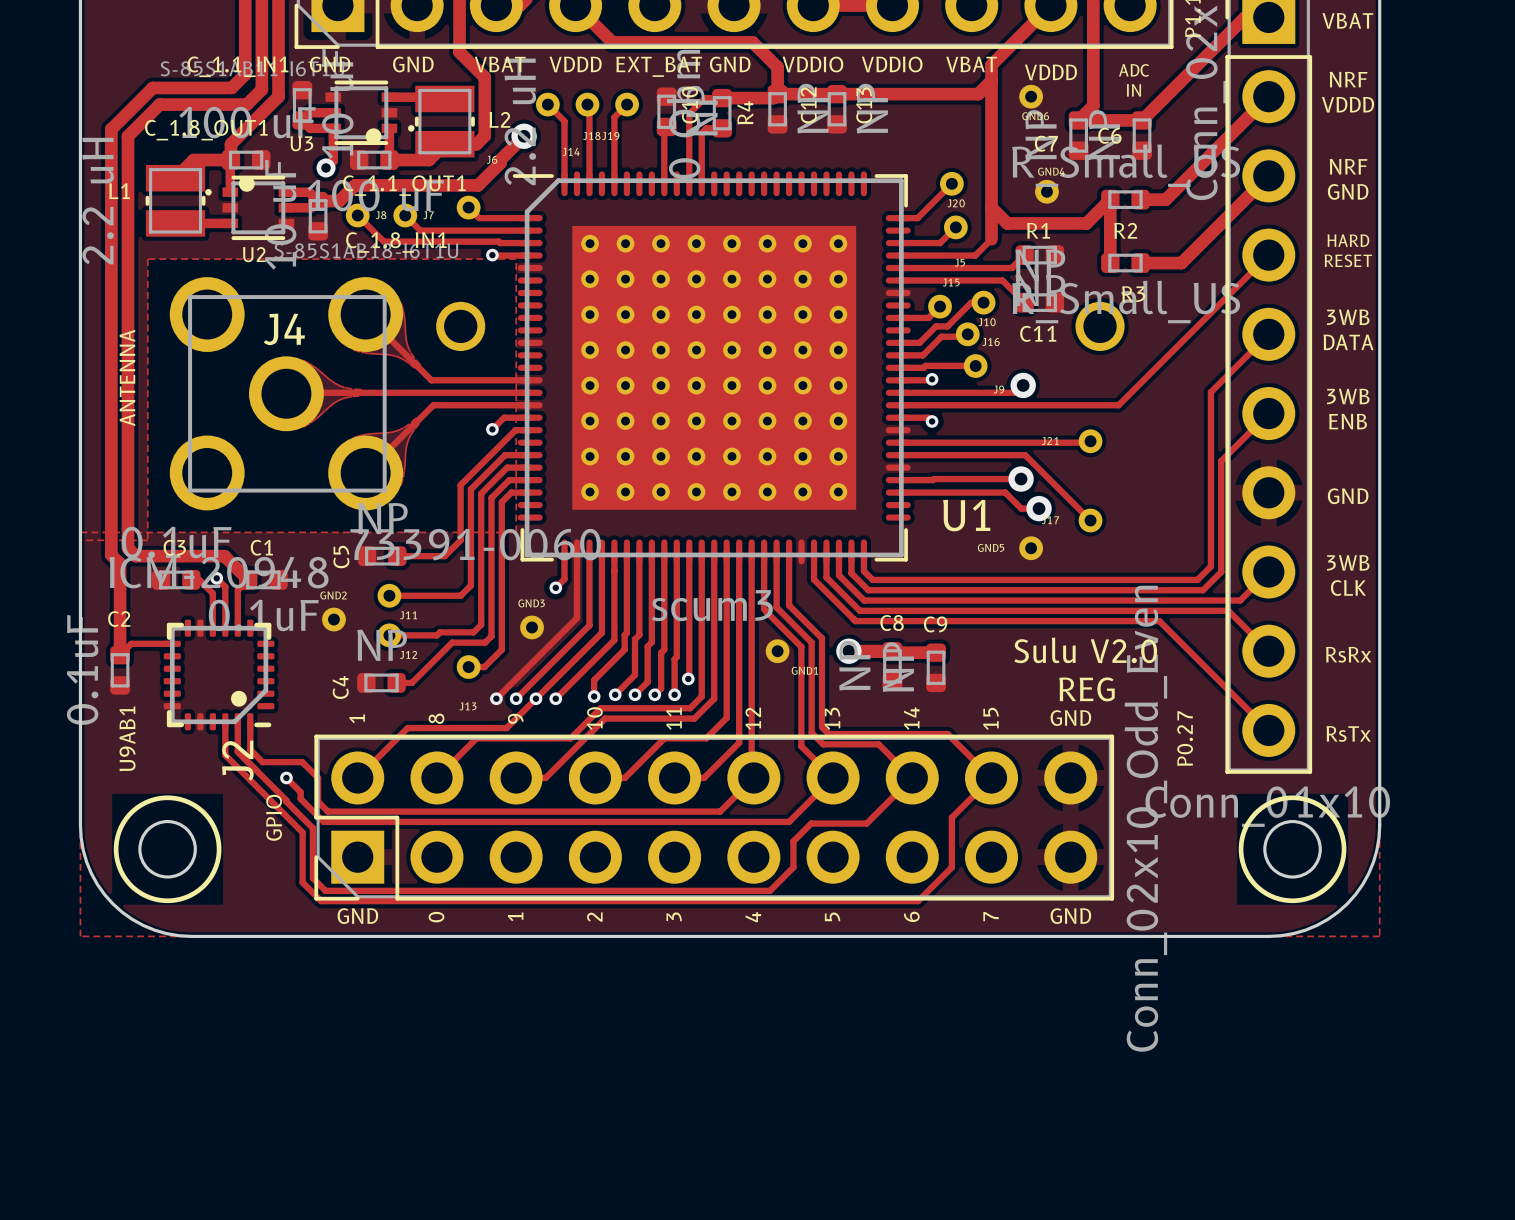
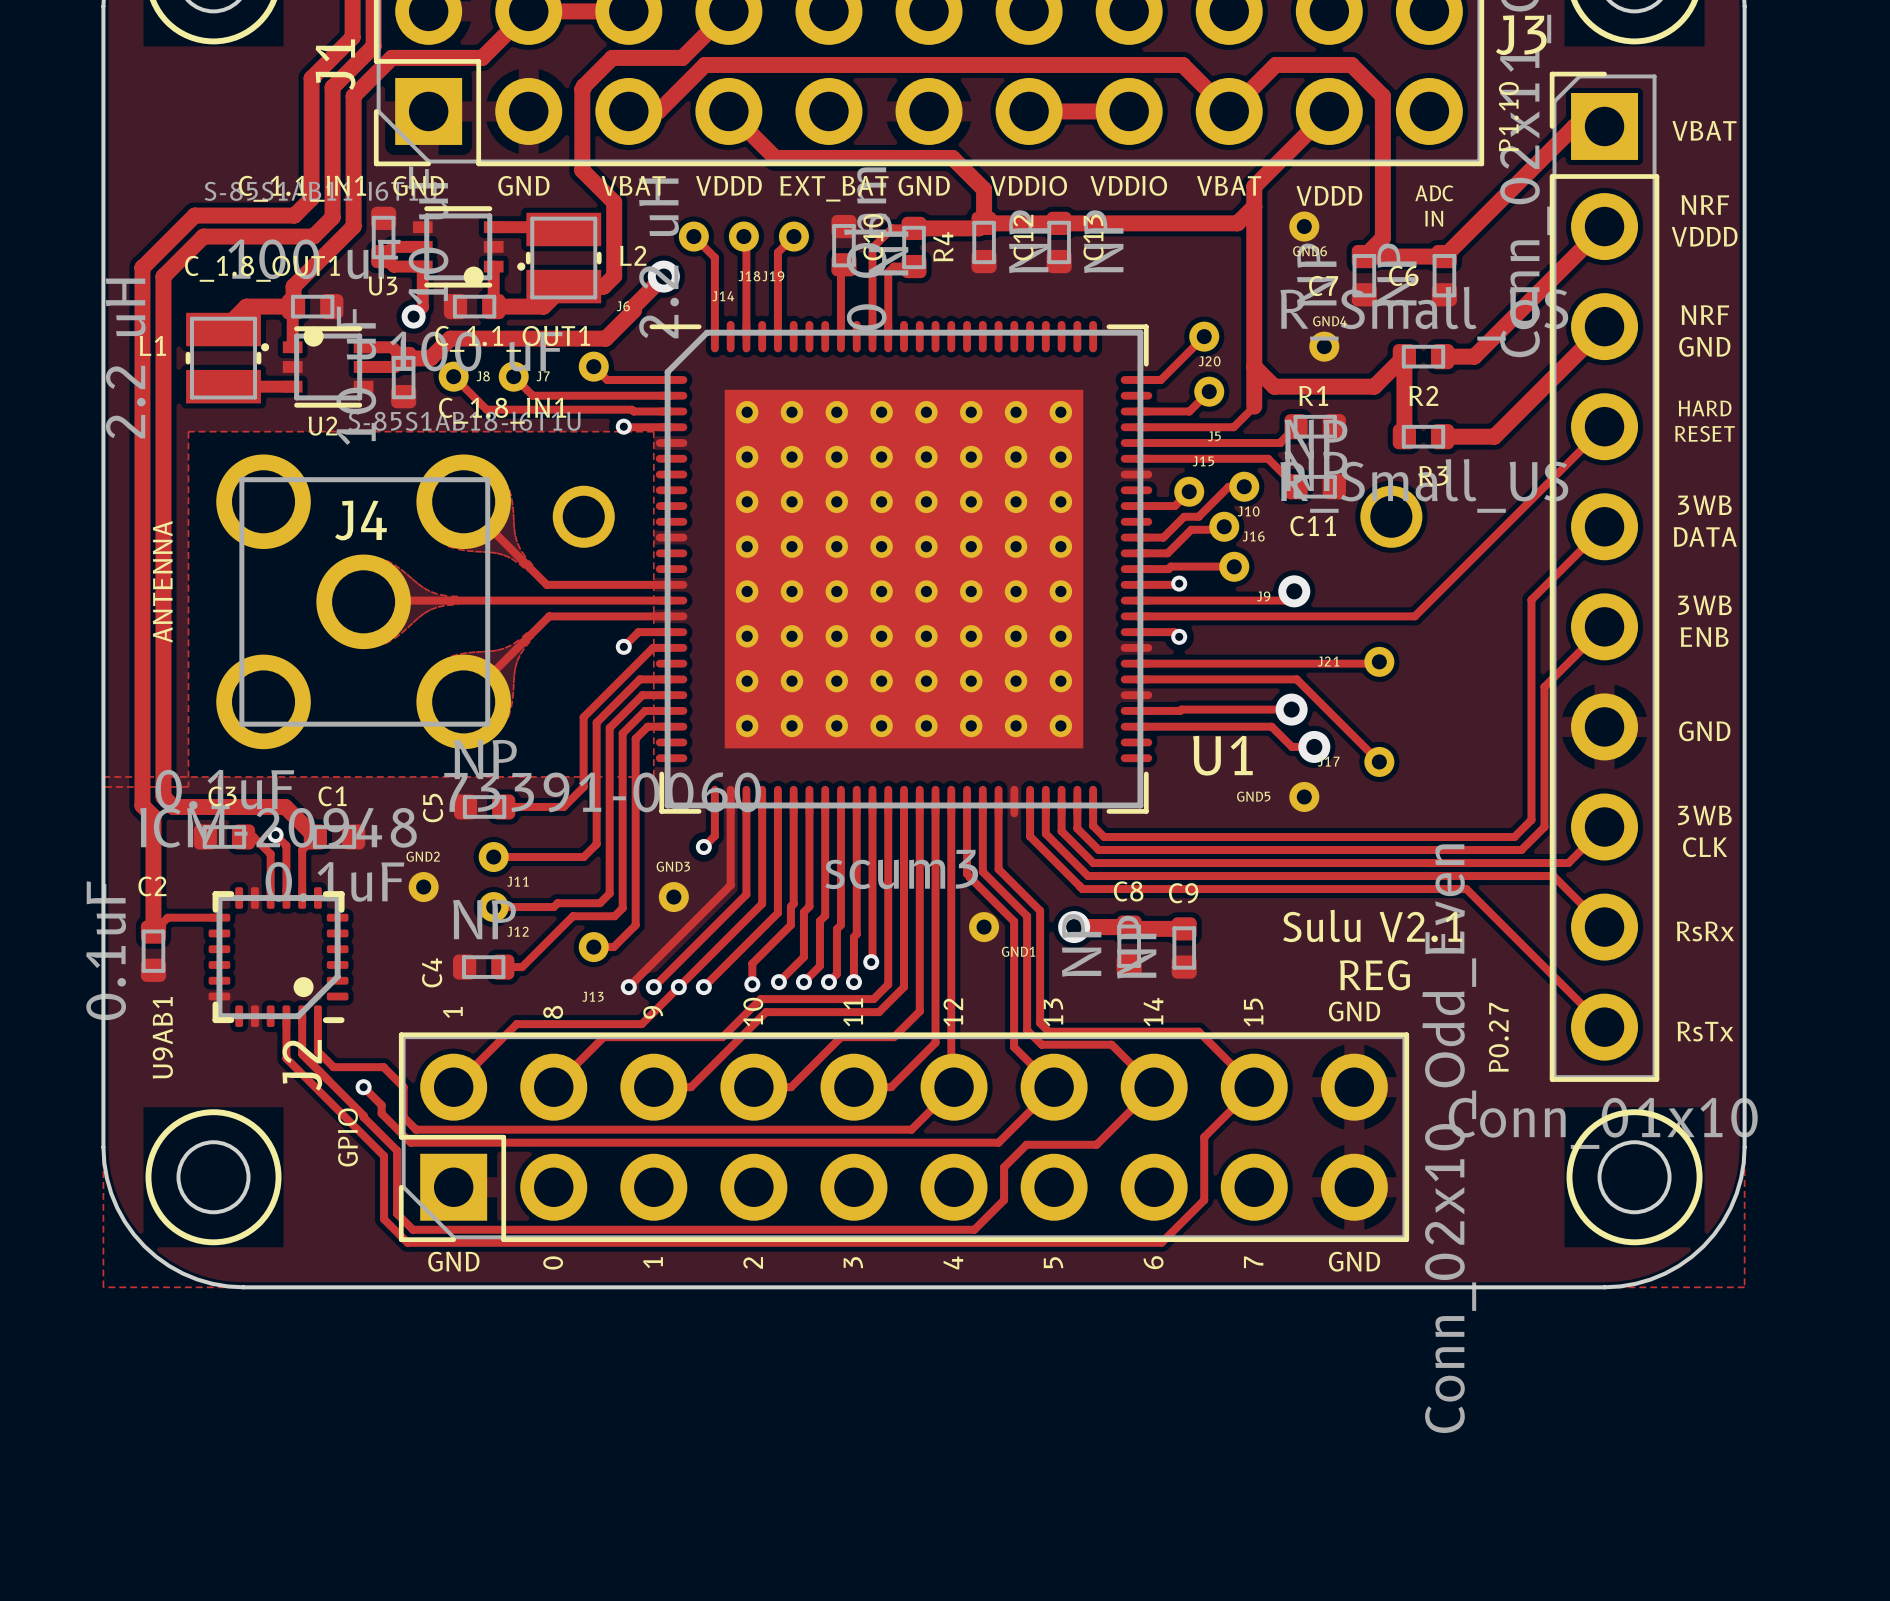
text: Sulu V2.0 (1085, 650) -> Sulu V2.1 (1372, 926)

